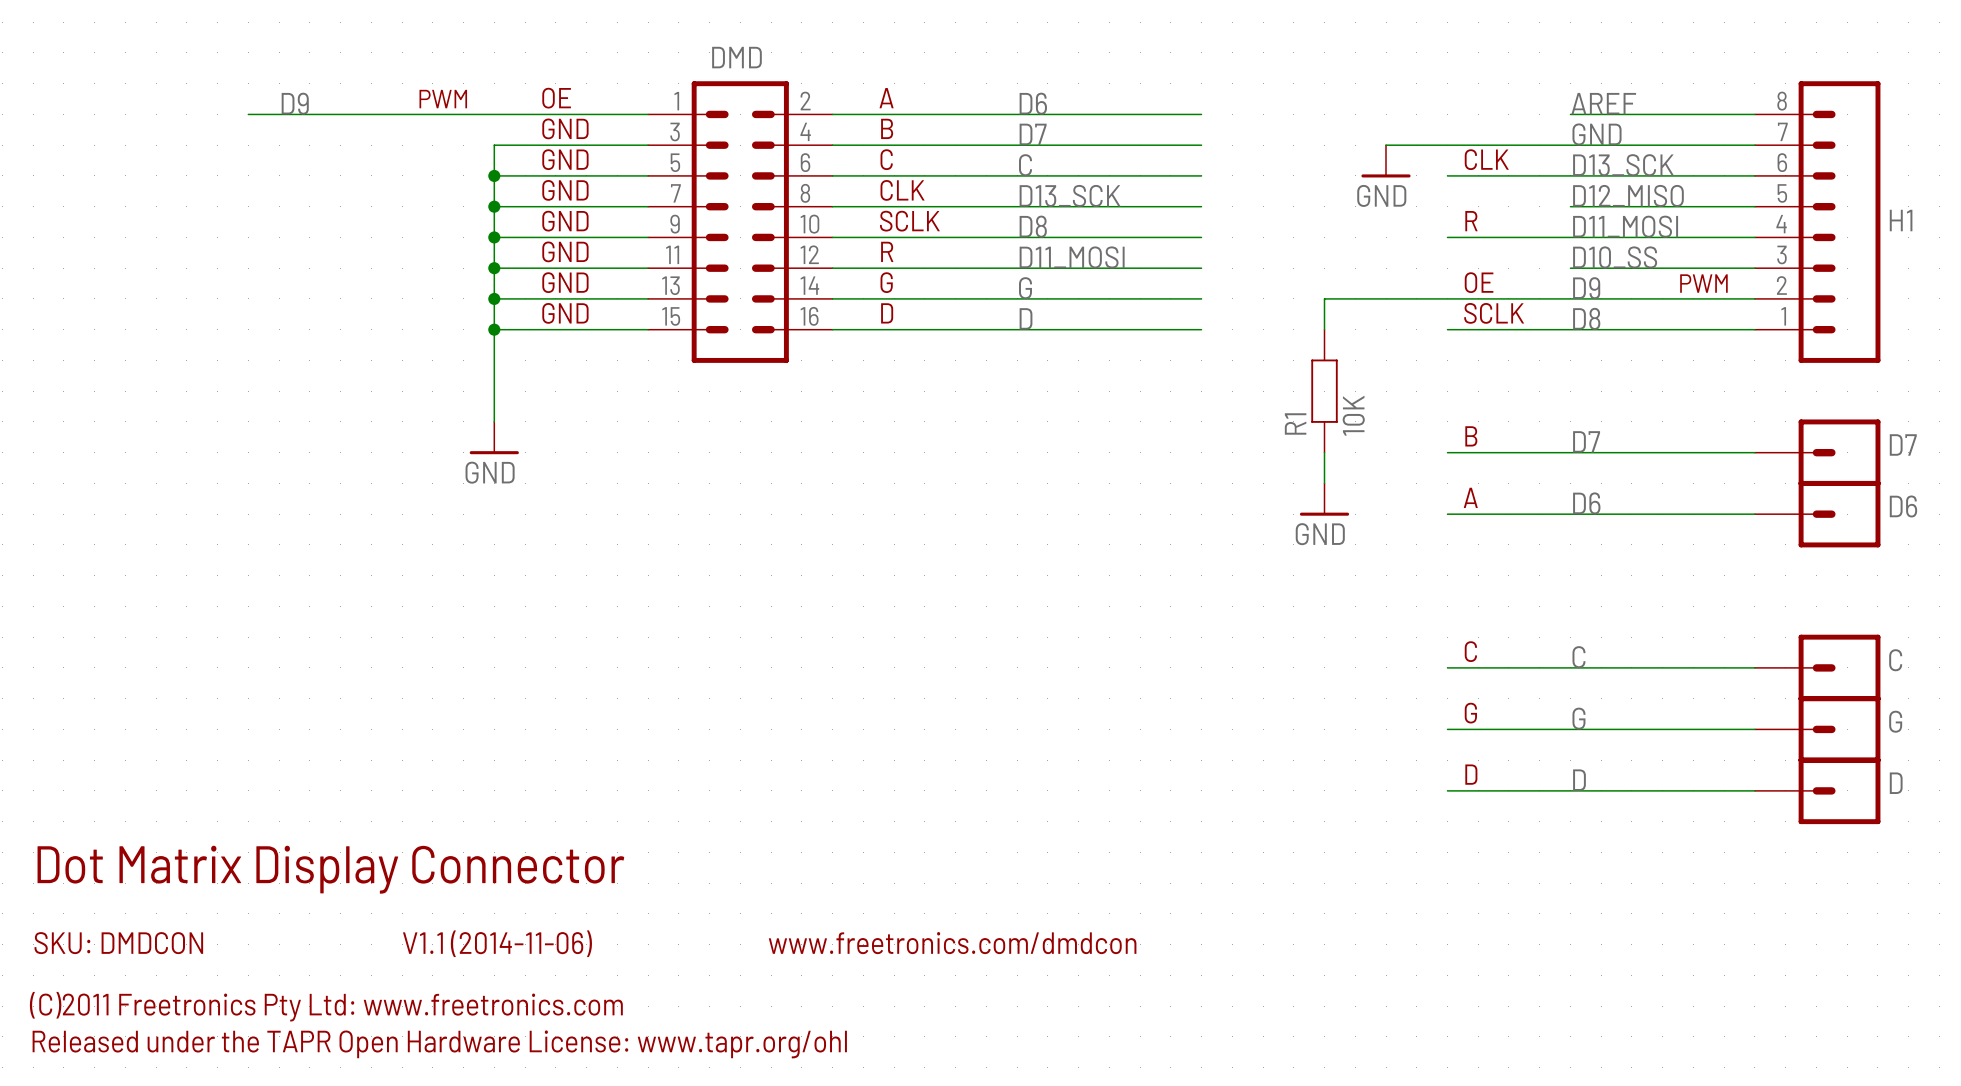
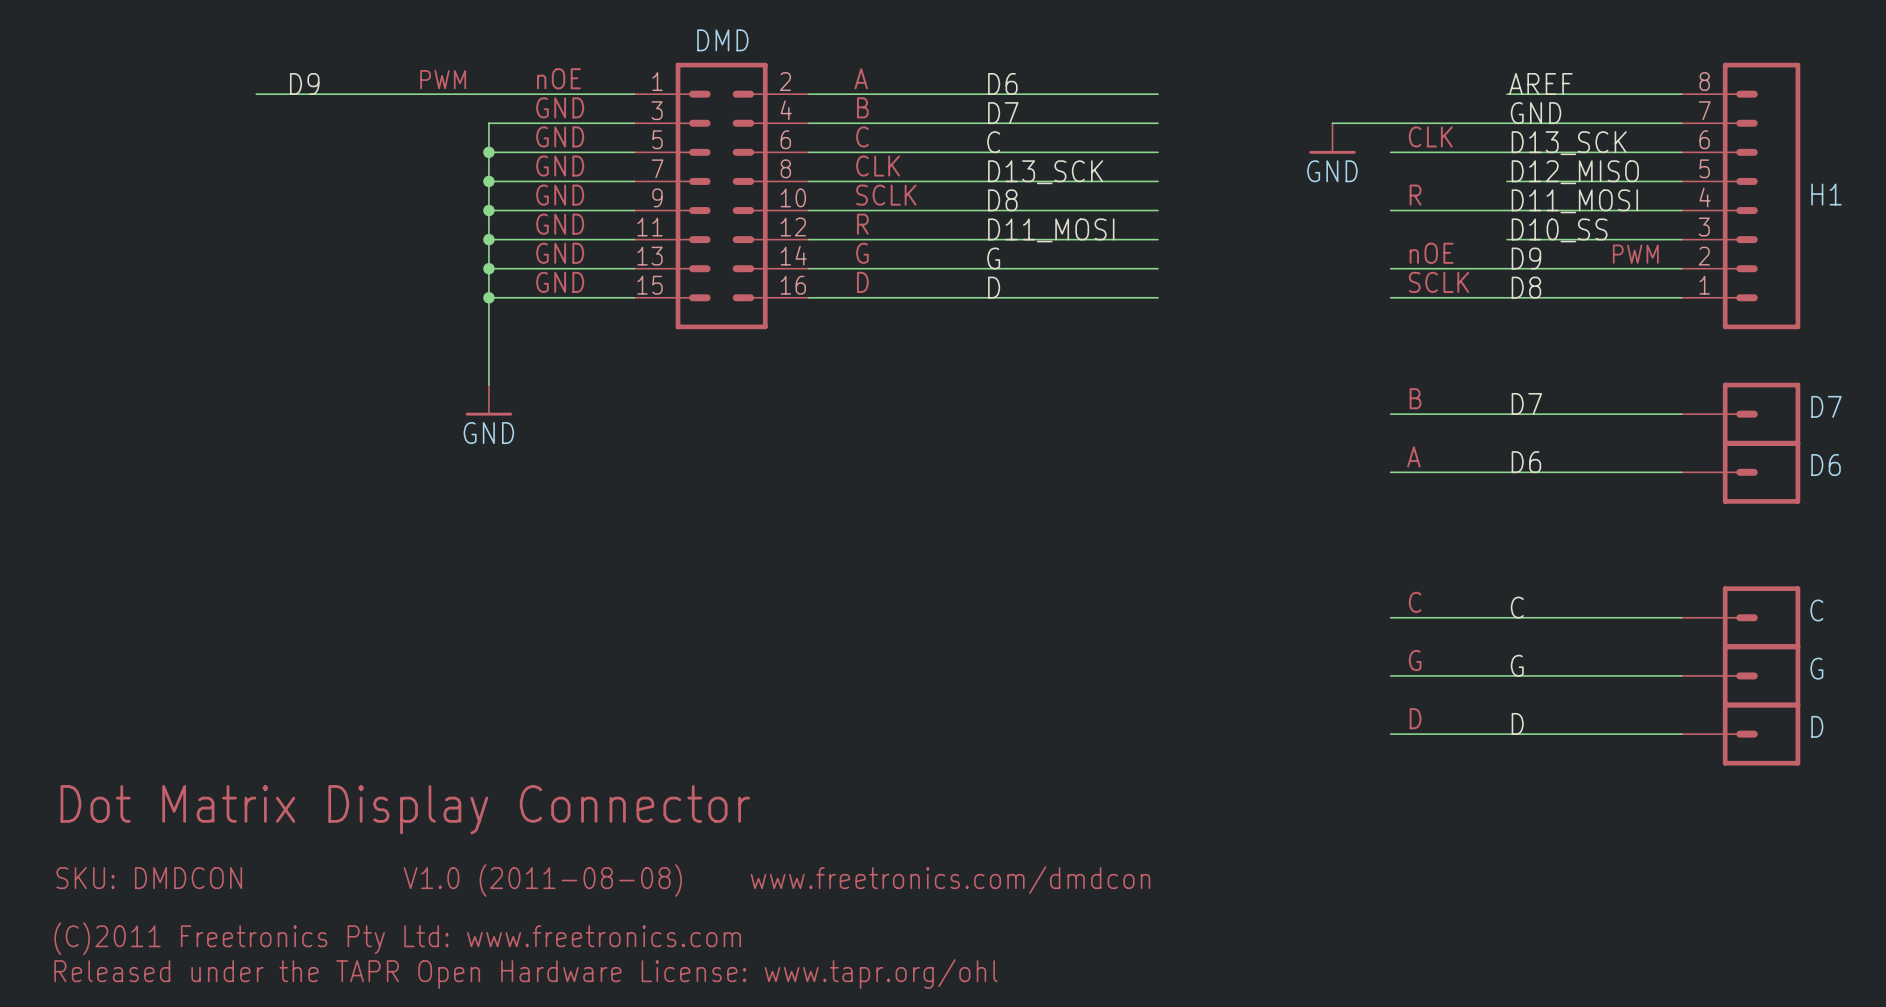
text: OE (556, 98) -> nOE (558, 78)
text: OE (1479, 282) -> nOE (1431, 253)
wire: (1447, 298) (1324, 298) (1324, 329) -> none
R1: 10K (1324, 391) -> none
wire: (1324, 452) (1324, 483) -> none
power symbol: GND (1324, 499) -> none
text: V1.1 (2014-11-06) (497, 943) -> V1.0 (2011-08-08) (542, 880)

